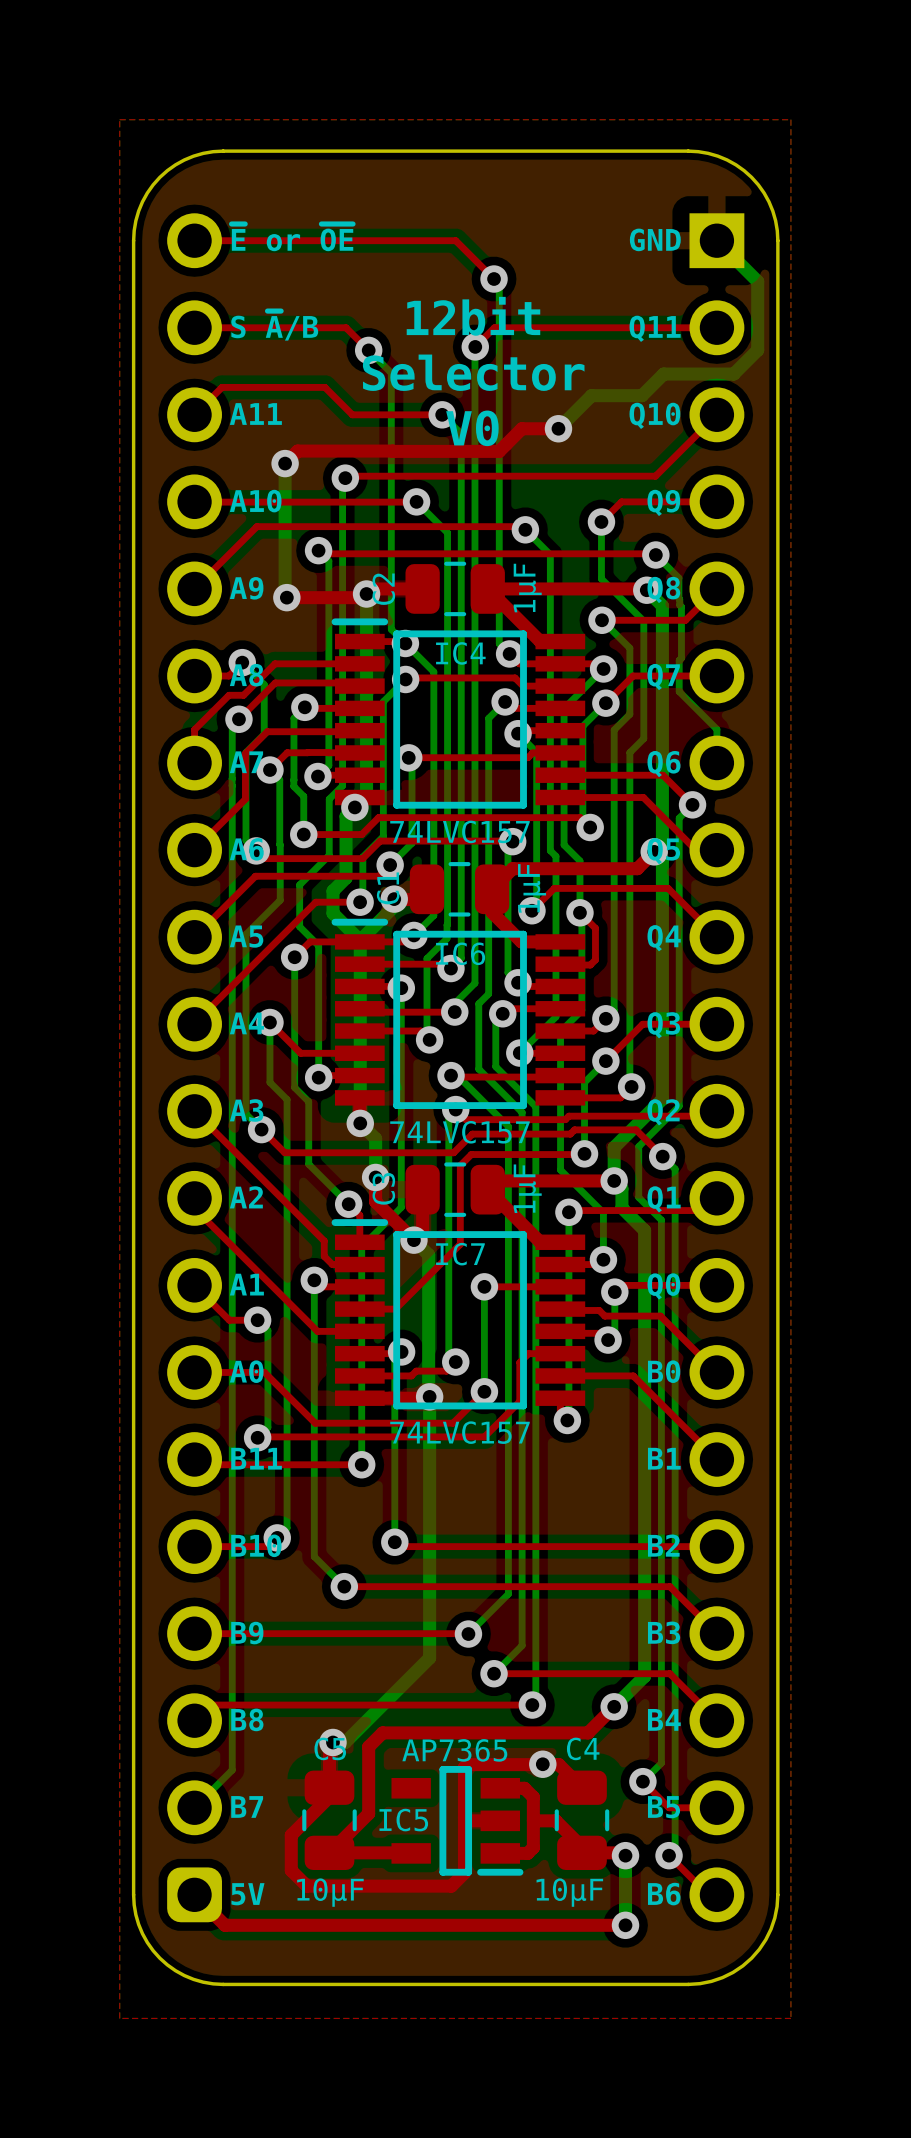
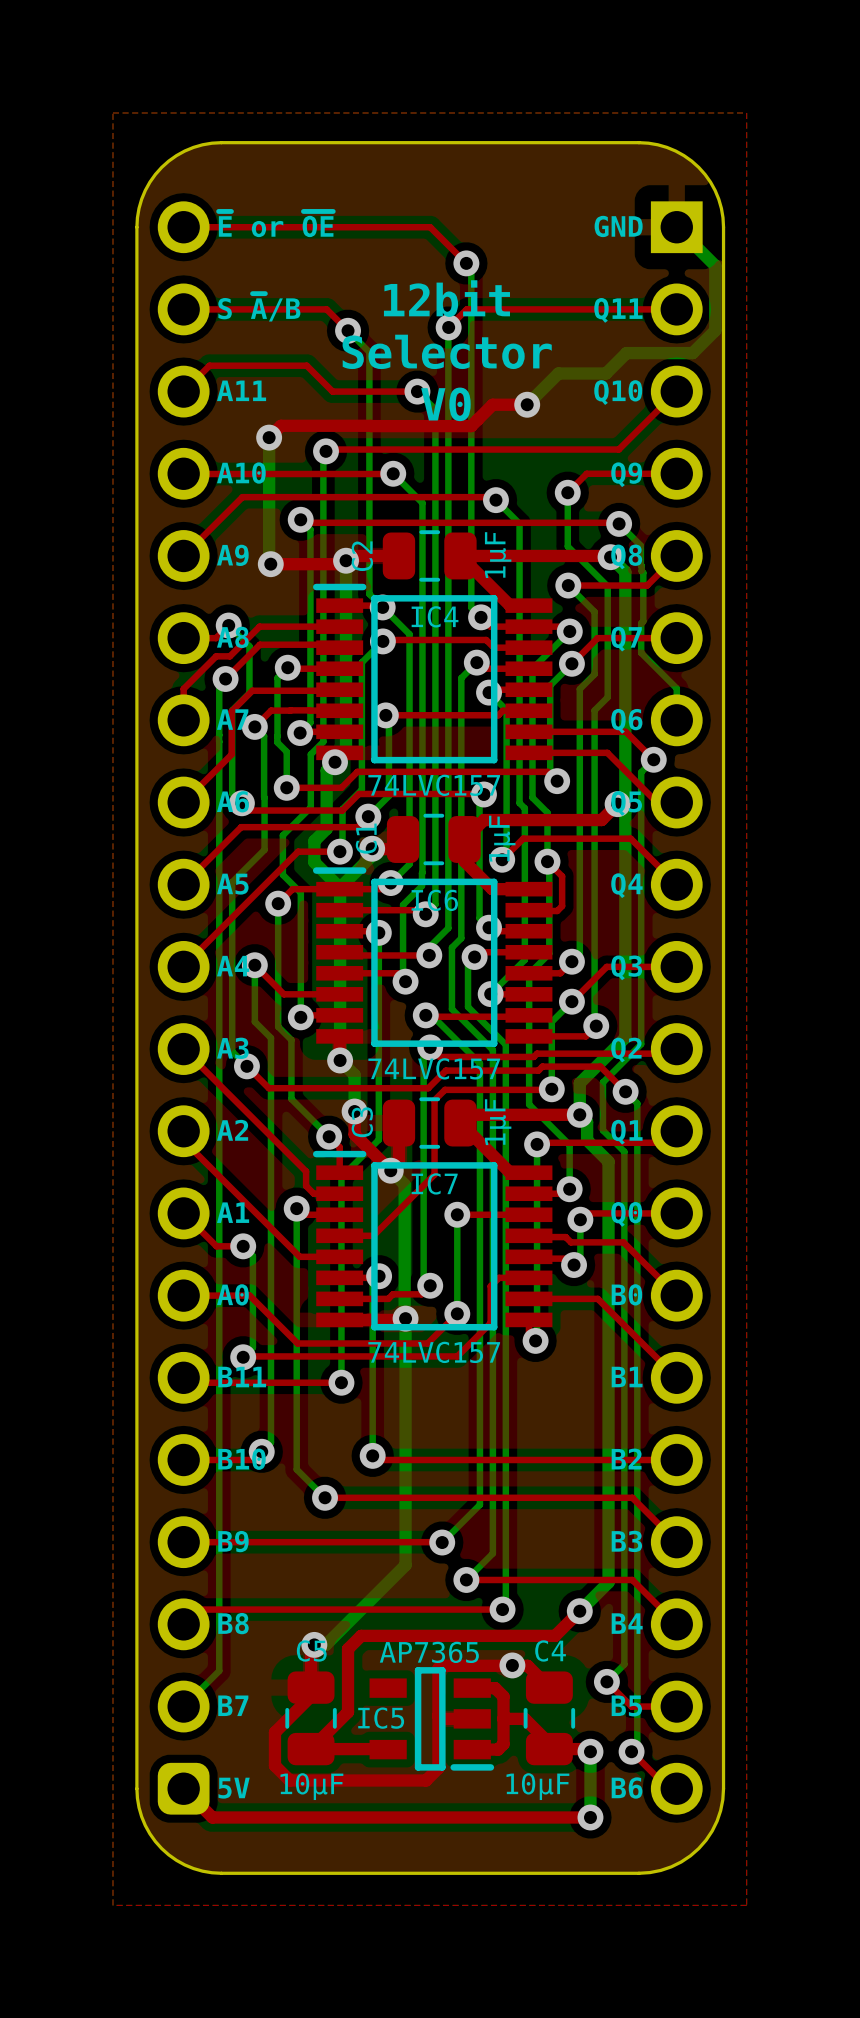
part footprint: [131, 149, 780, 1987] -> [135, 141, 726, 1875]

